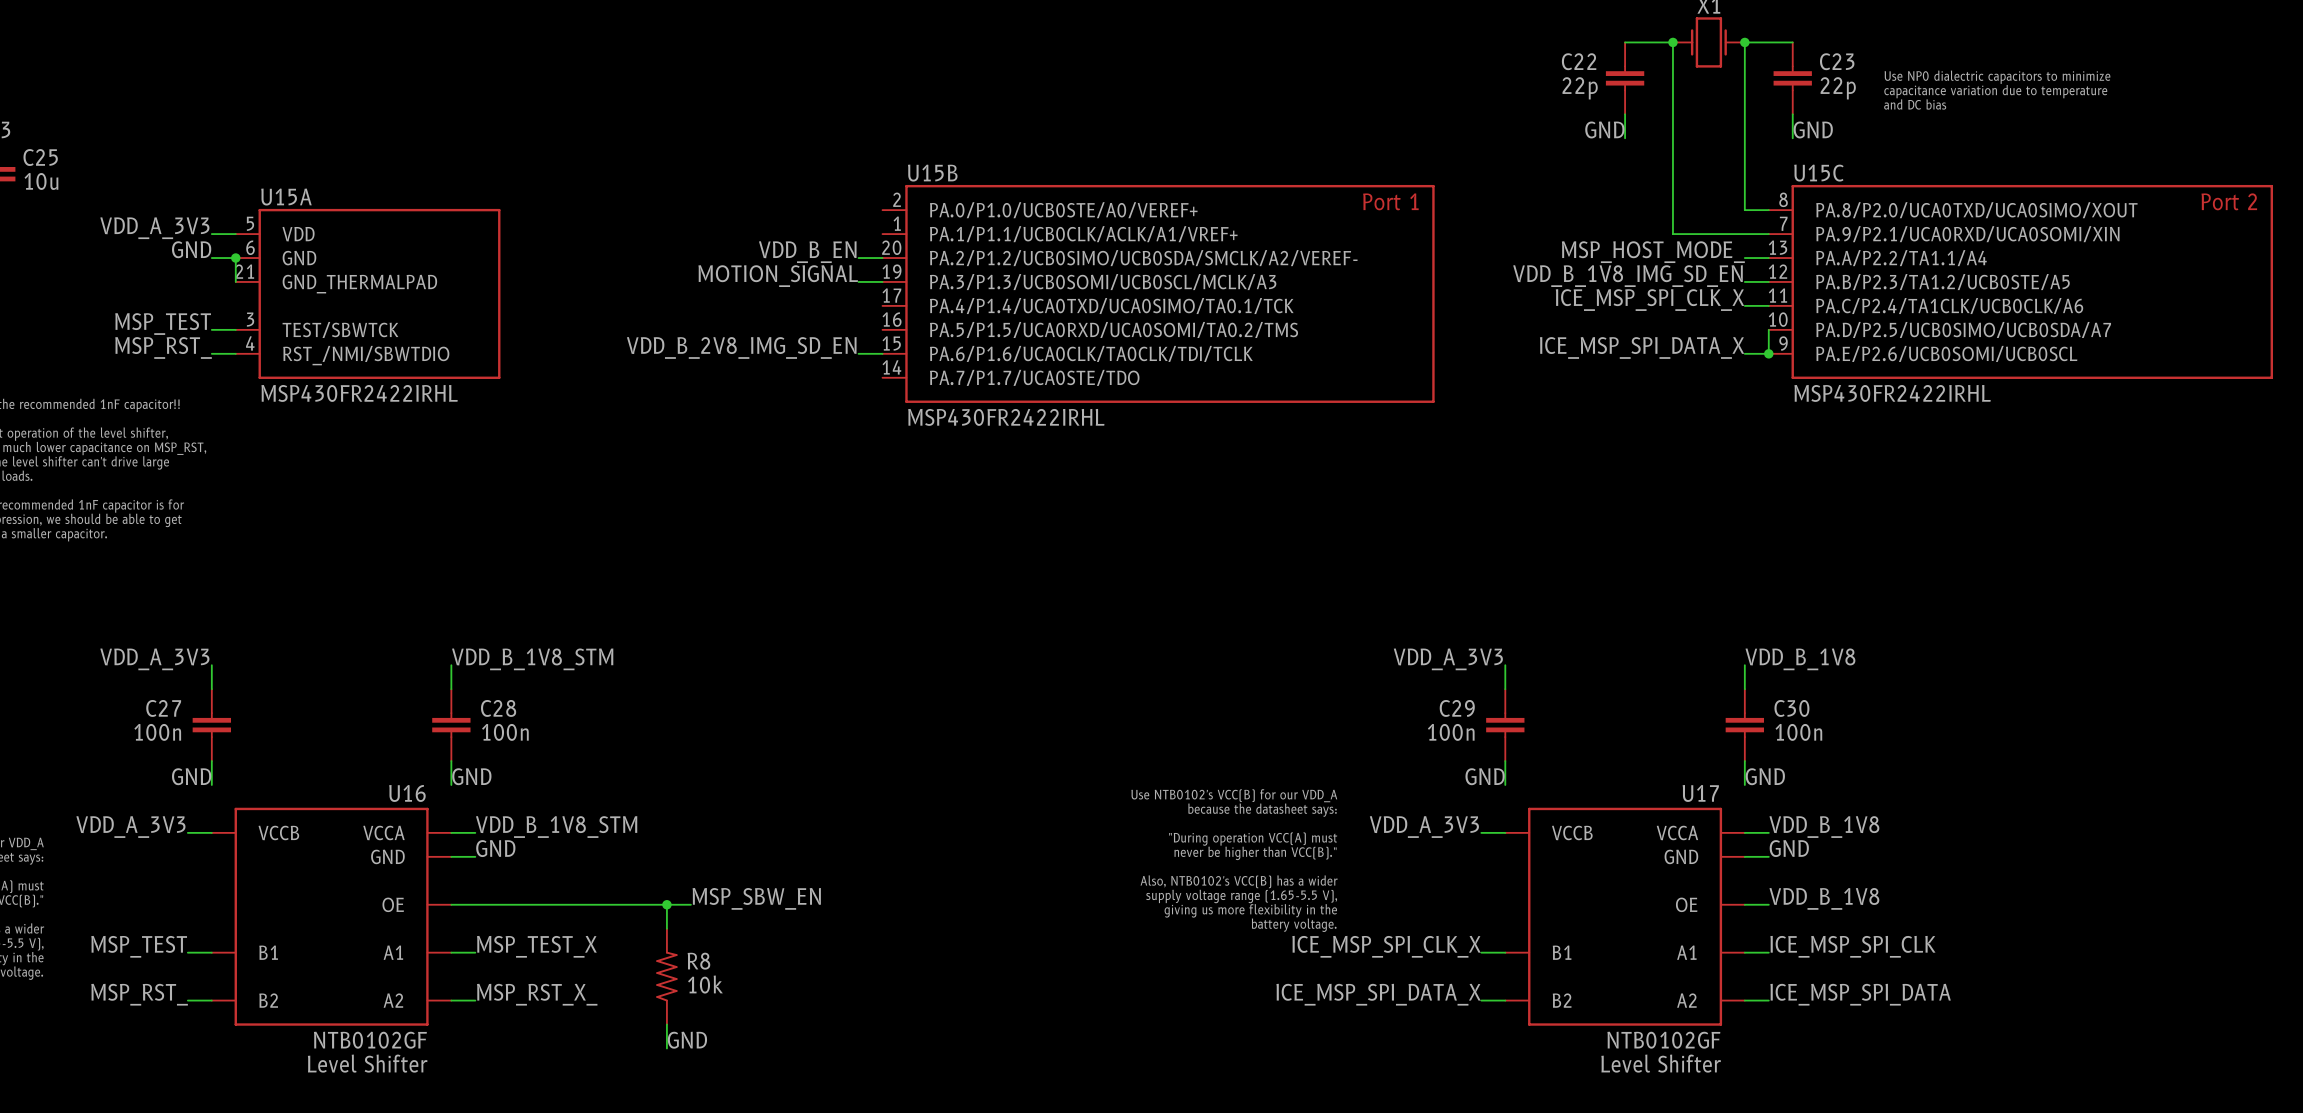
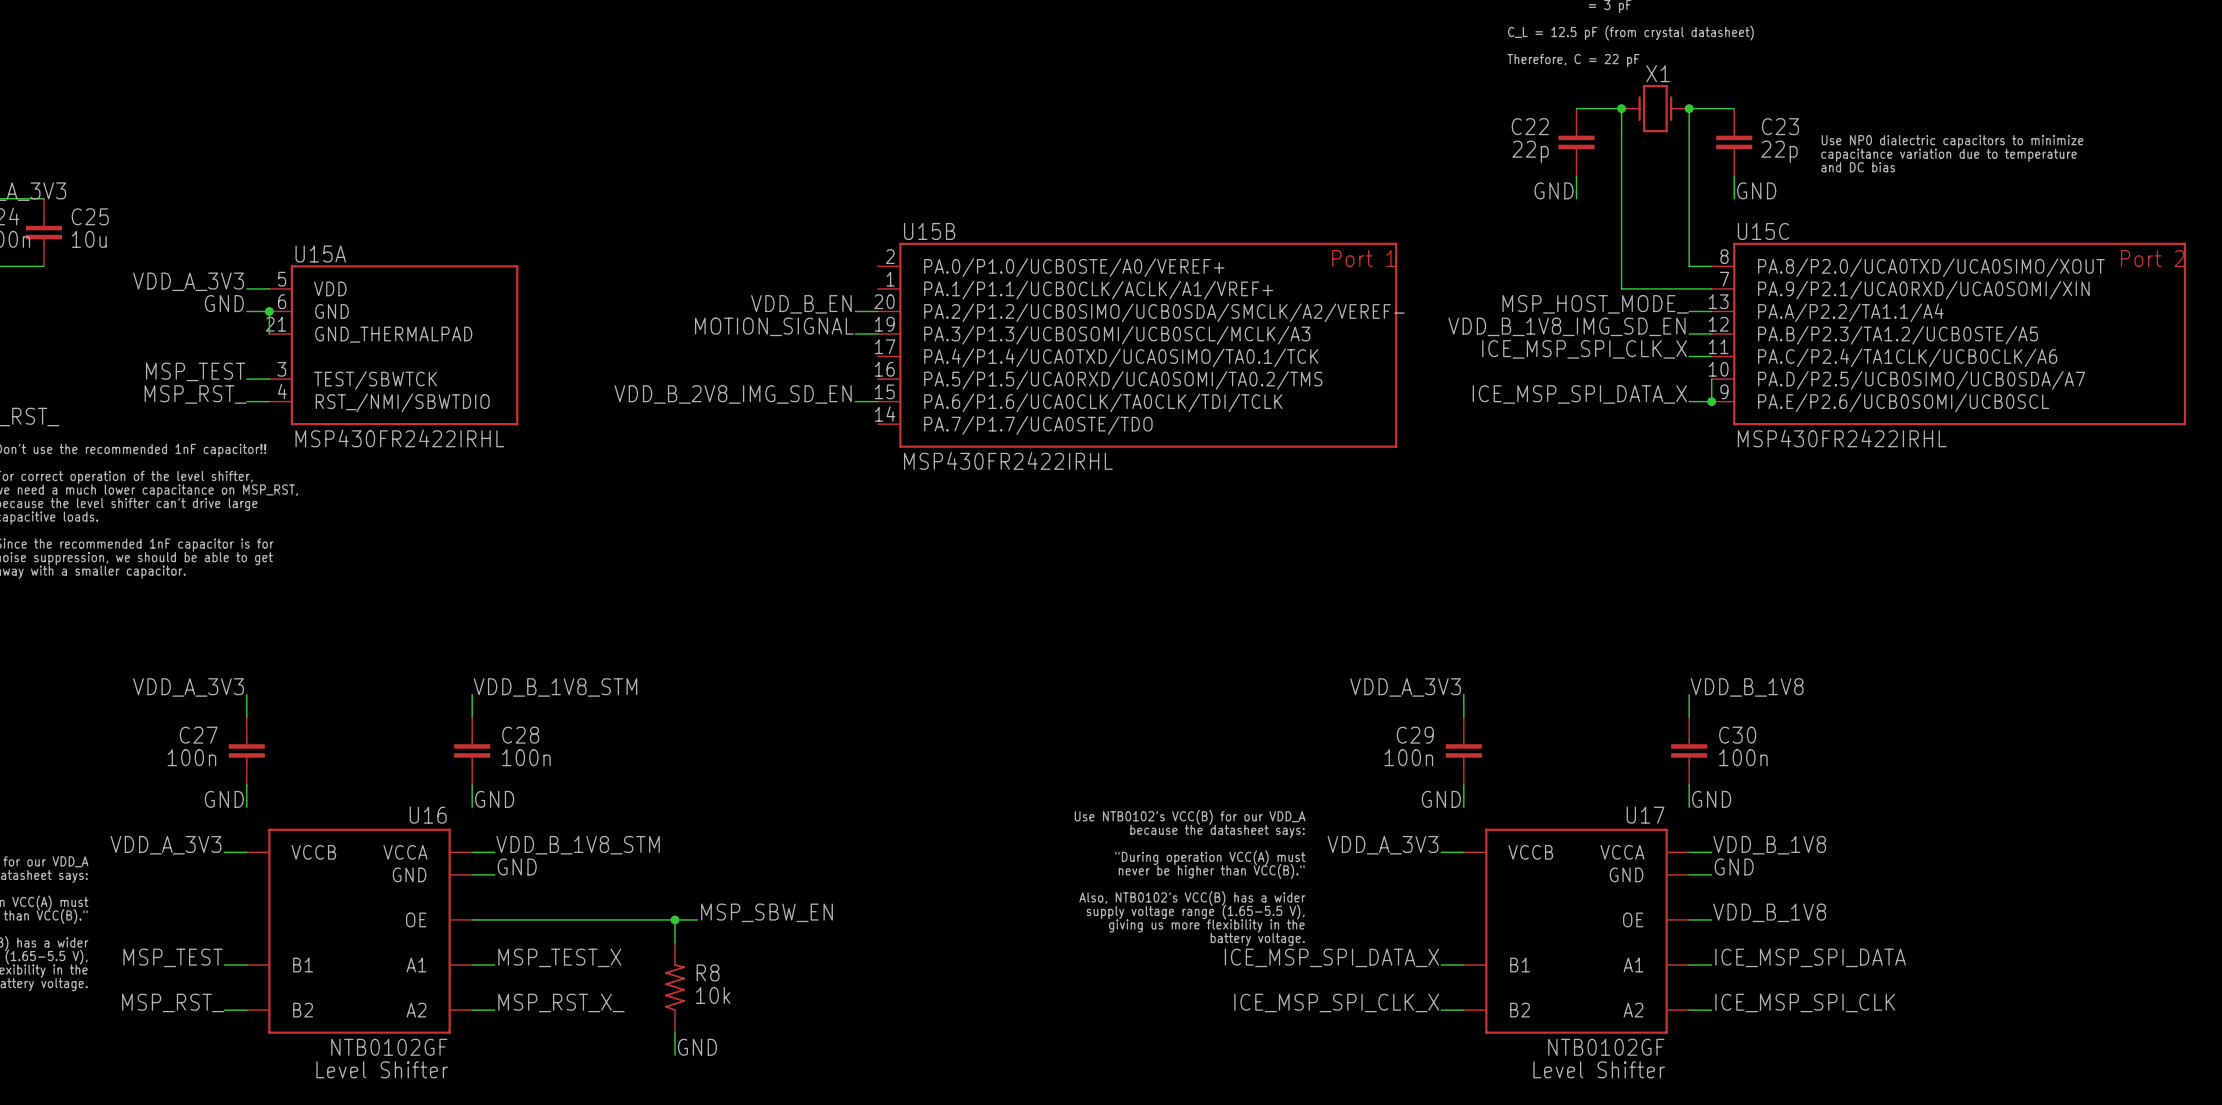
label: ICE_MSP_SPI_CLK_X (1386, 946) -> ICE_MSP_SPI_DATA_X (1331, 957)
label: ICE_MSP_SPI_CLK (1852, 946) -> ICE_MSP_SPI_DATA (1810, 957)
label: ICE_MSP_SPI_DATA_X (1378, 994) -> ICE_MSP_SPI_CLK_X (1336, 1002)
label: ICE_MSP_SPI_DATA (1860, 994) -> ICE_MSP_SPI_CLK (1805, 1002)

